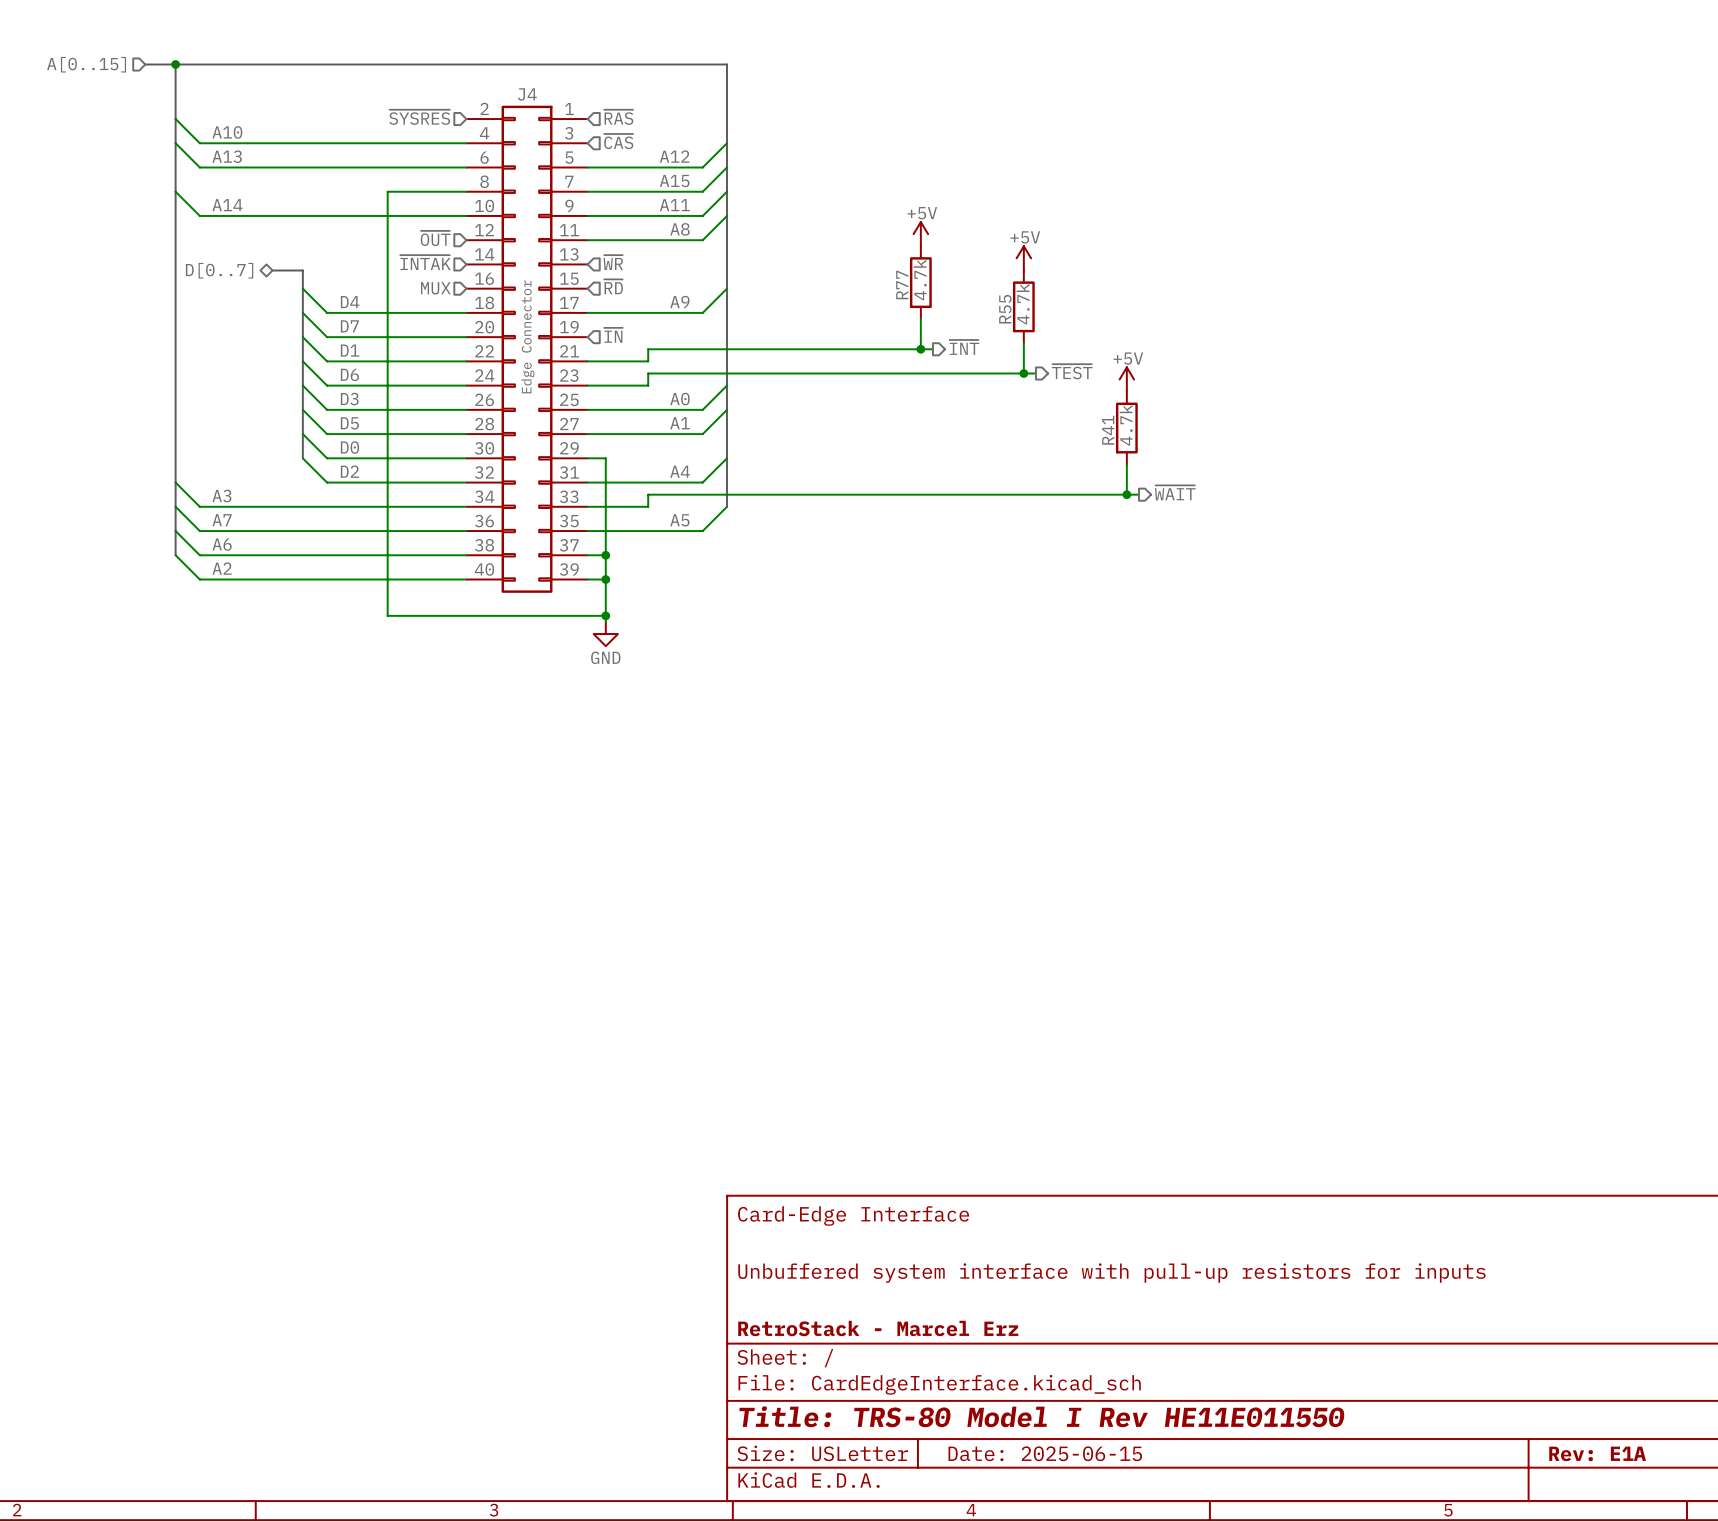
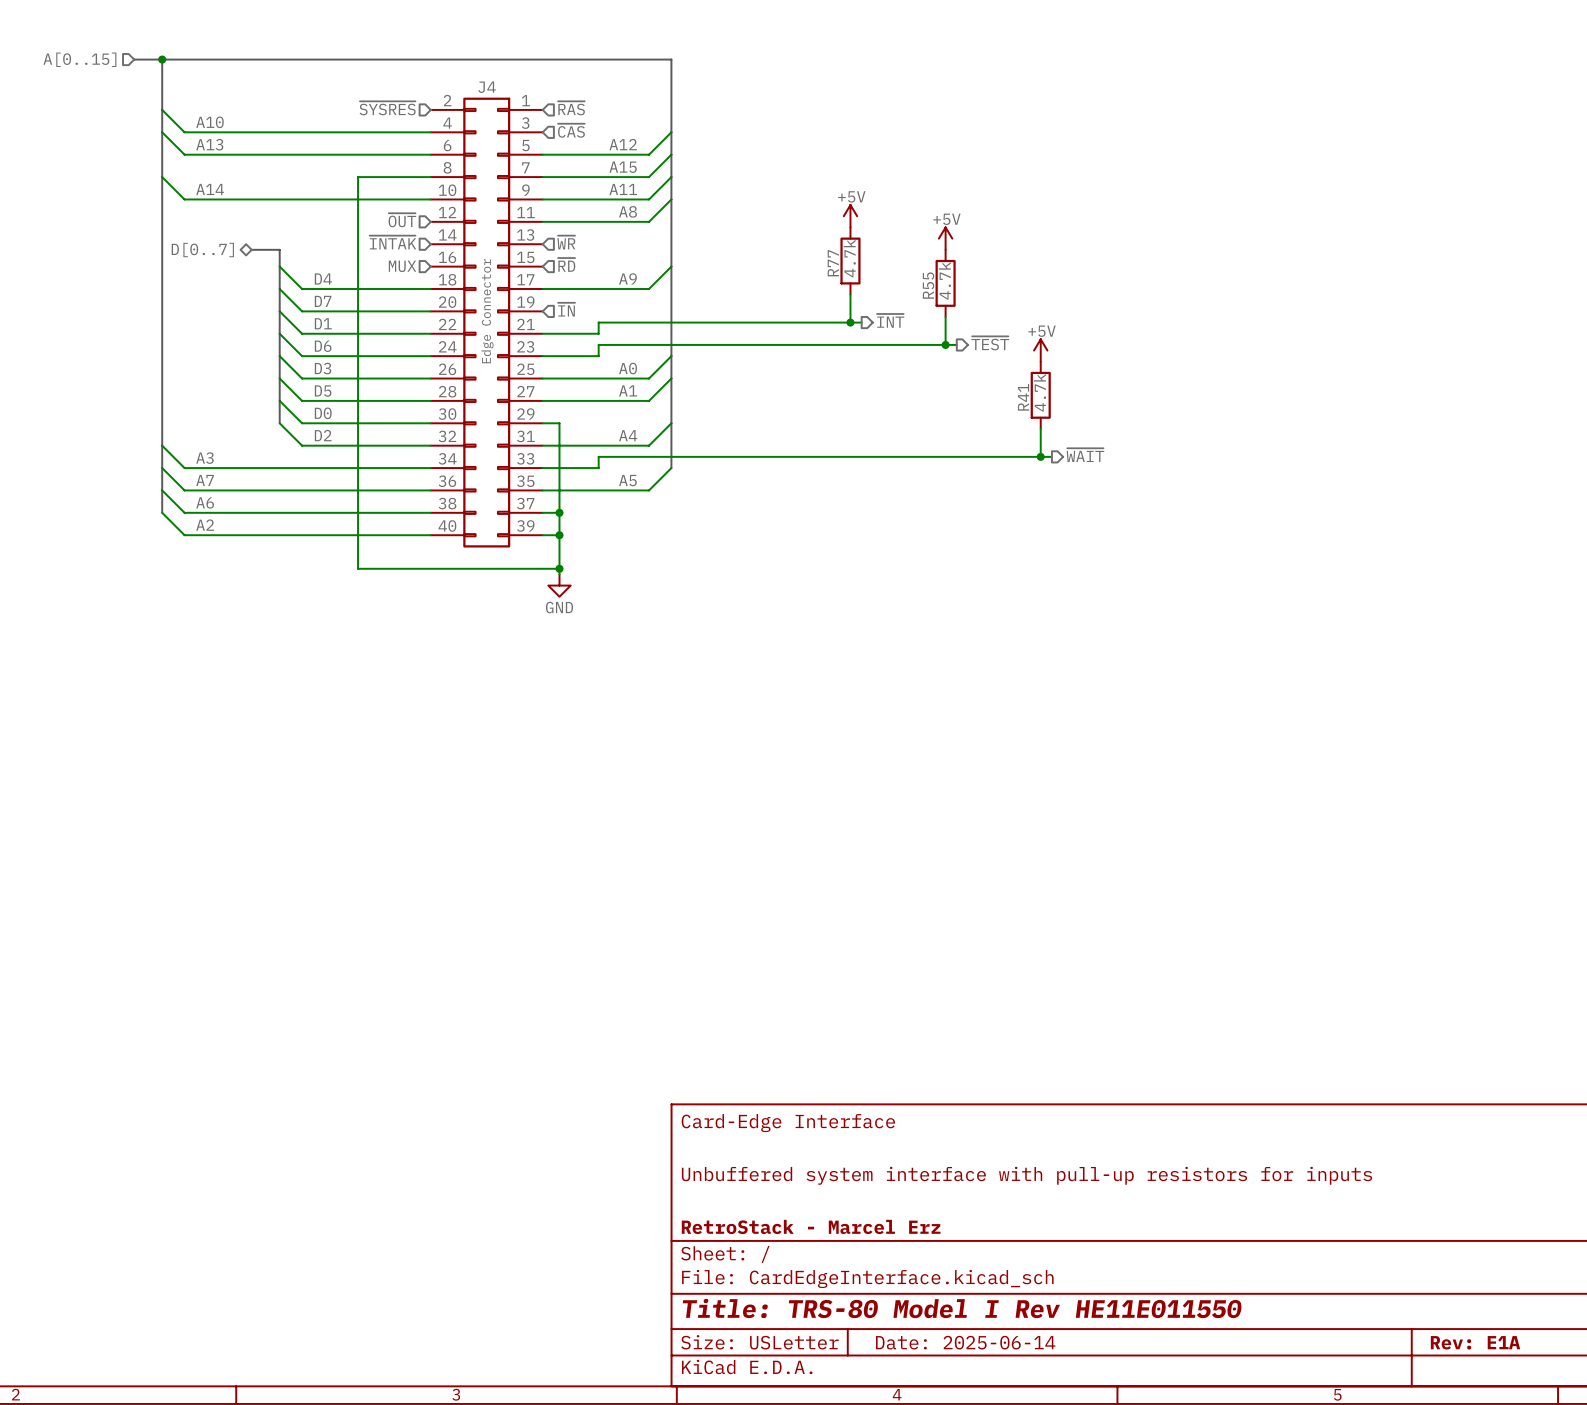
title block: Date: 2025-06-15 (1045, 1453) -> Date: 2025-06-14 (965, 1342)

